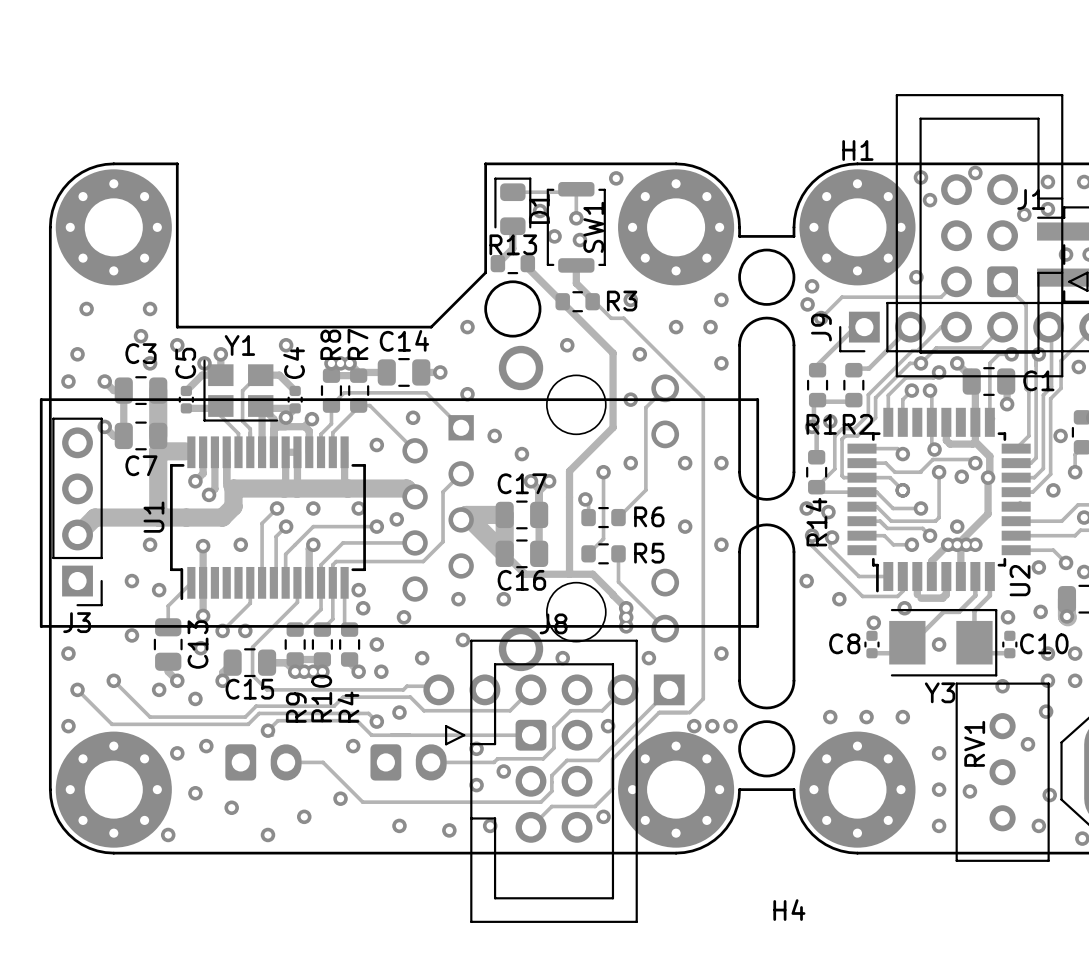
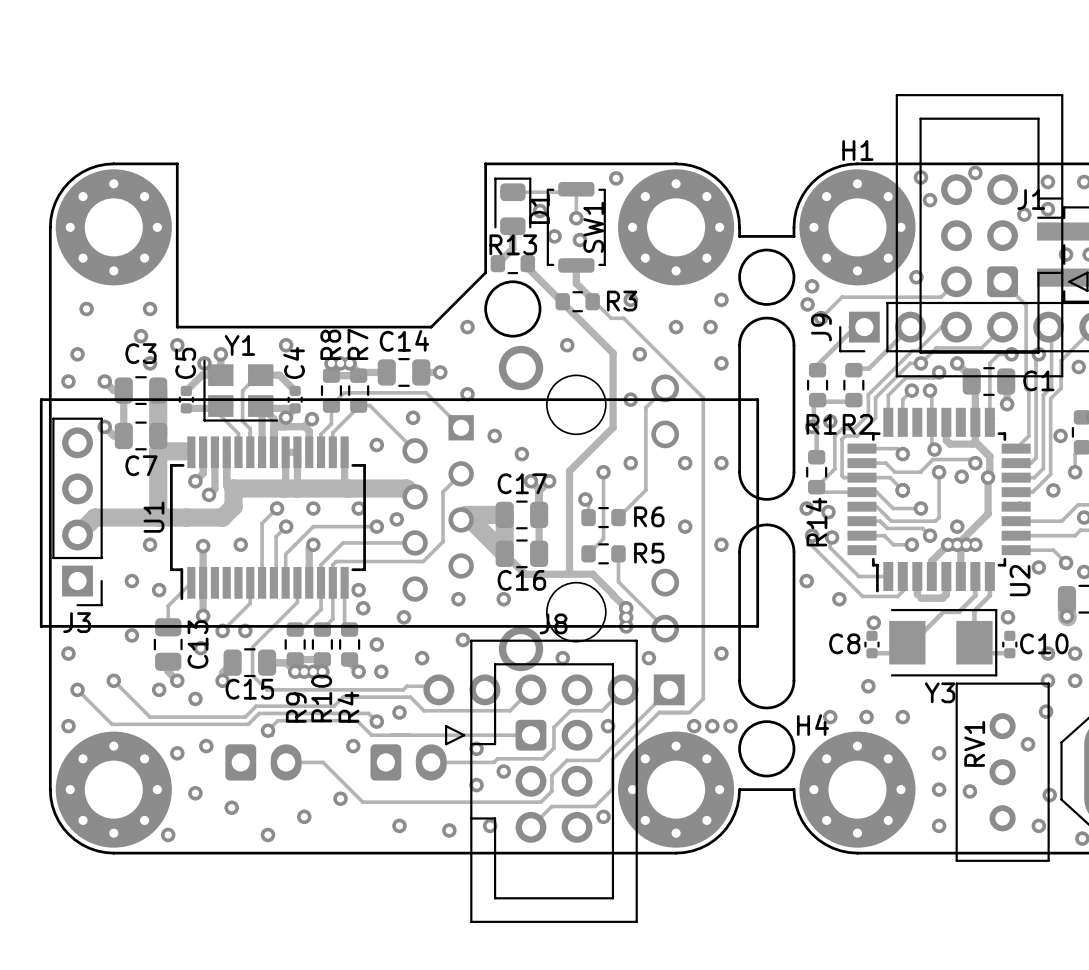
via: (904, 608) -> none
via: (1040, 611) -> none
via: (939, 644) -> none
via: none -> (868, 686)
via: (1002, 686) -> none
H4 name position: H4 (789, 910) -> H4 (812, 725)

